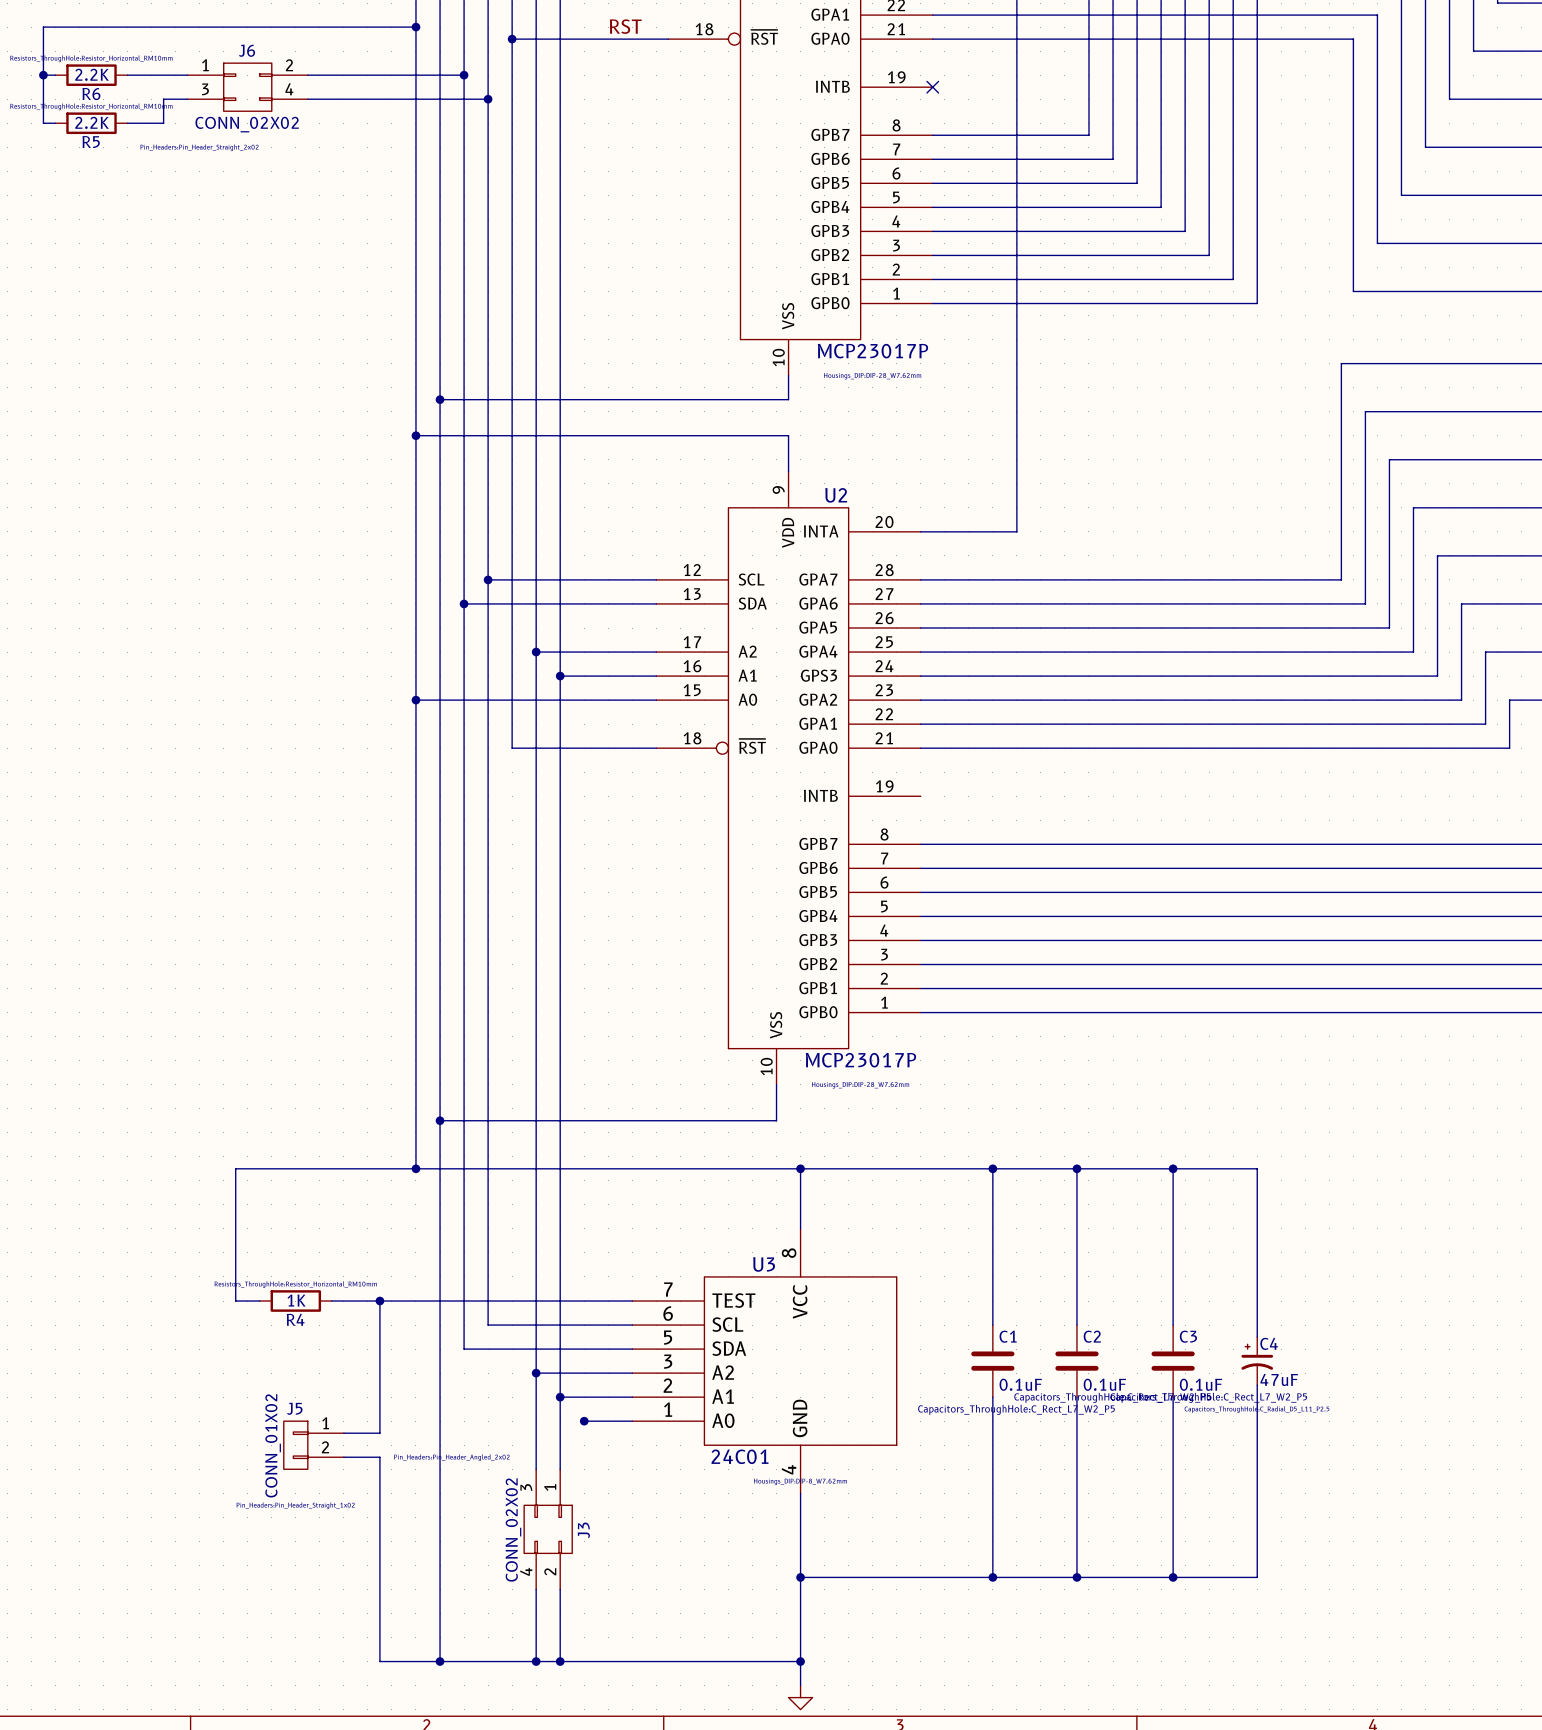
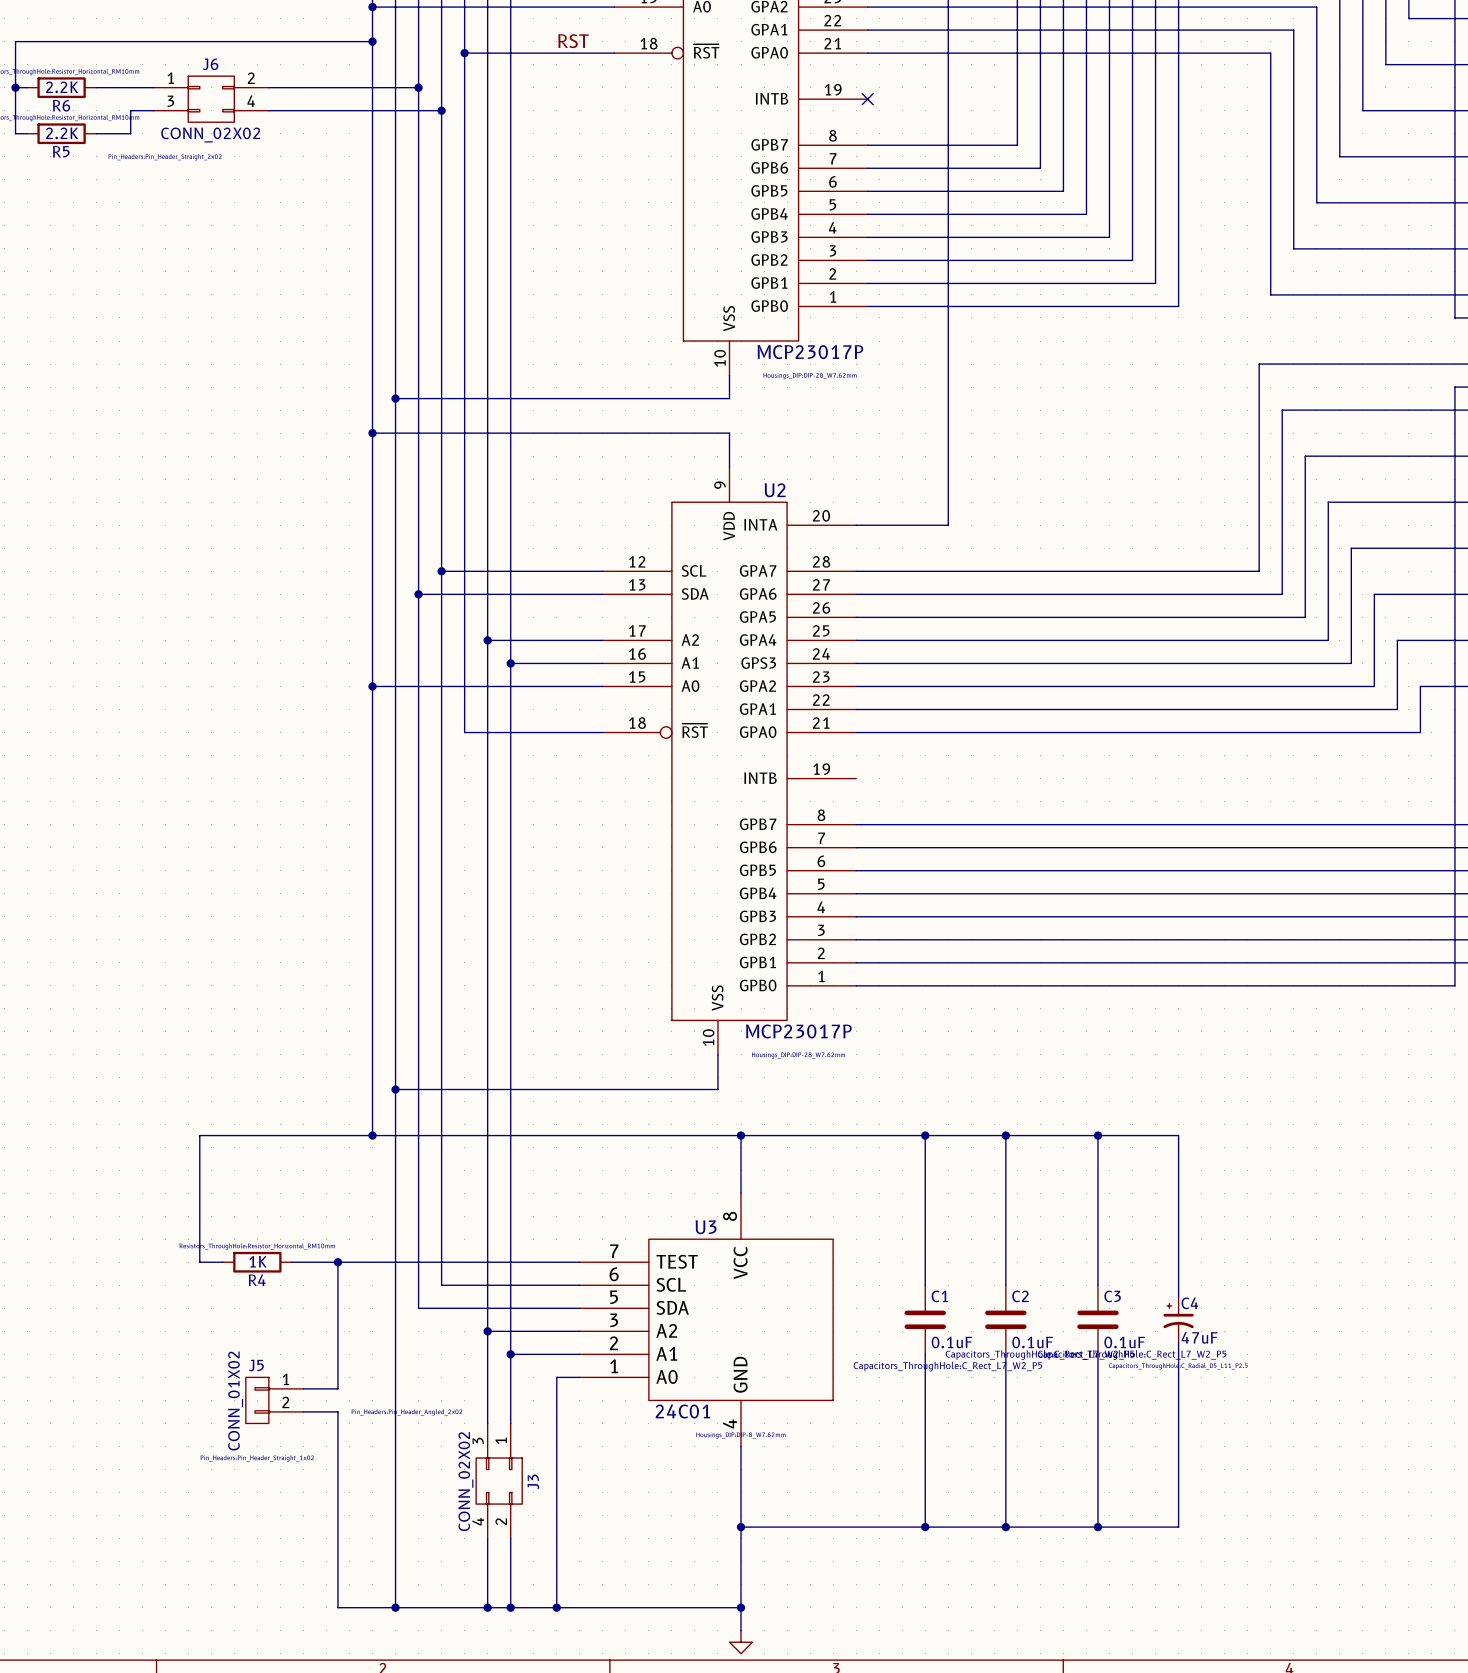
wire: (584, 1421) (608, 1421) -> (556, 1607) (556, 1377)
junction: (584, 1421) -> none
junction: none -> (556, 1607)

